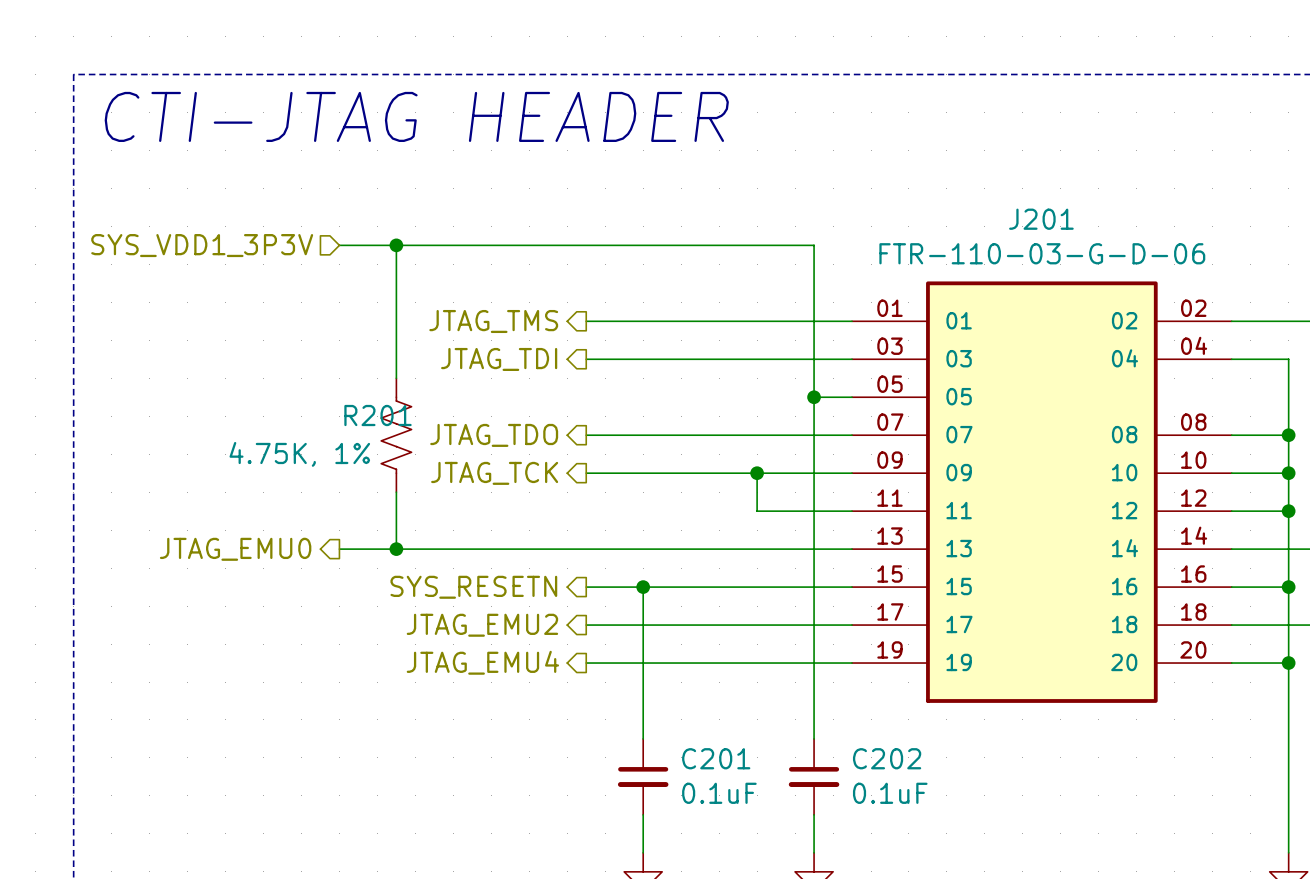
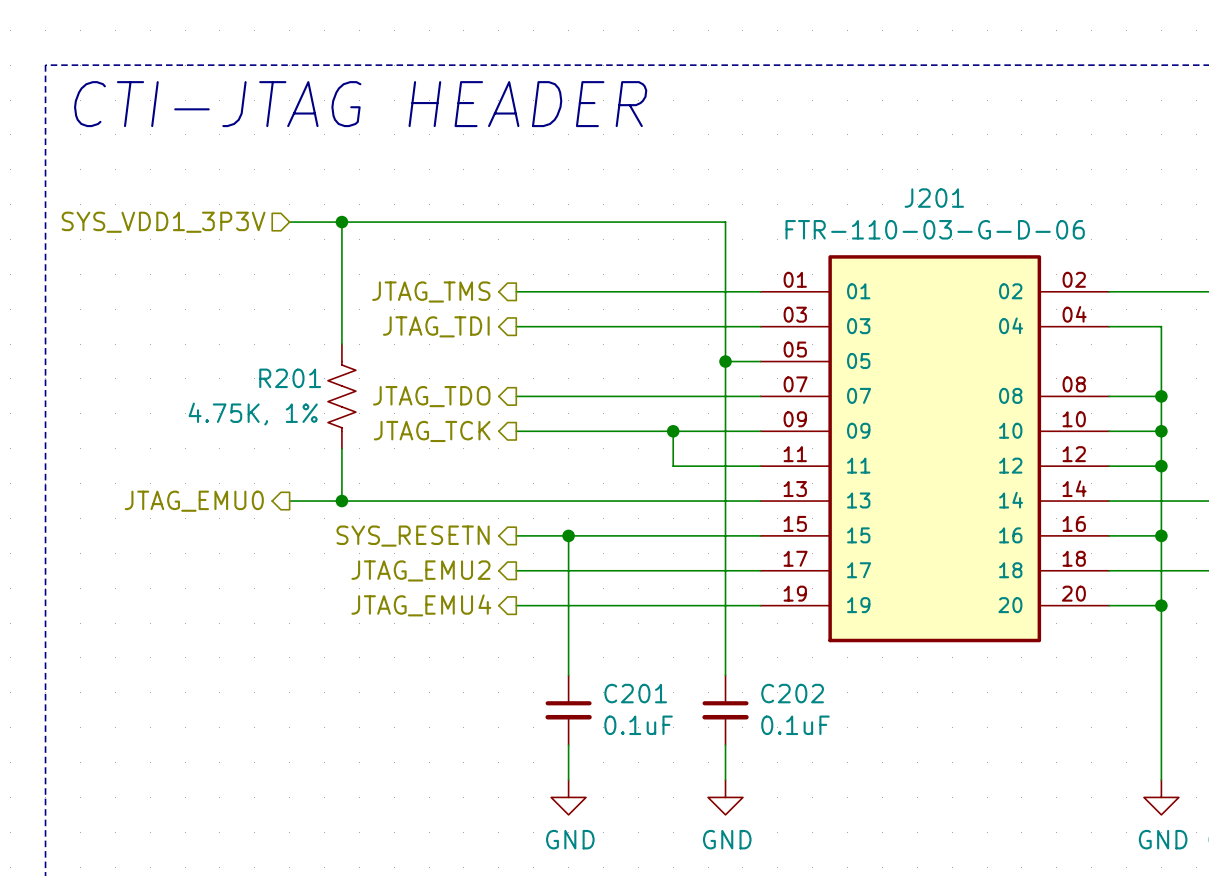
R201 name position: R201 (378, 415) -> R201 (290, 378)

